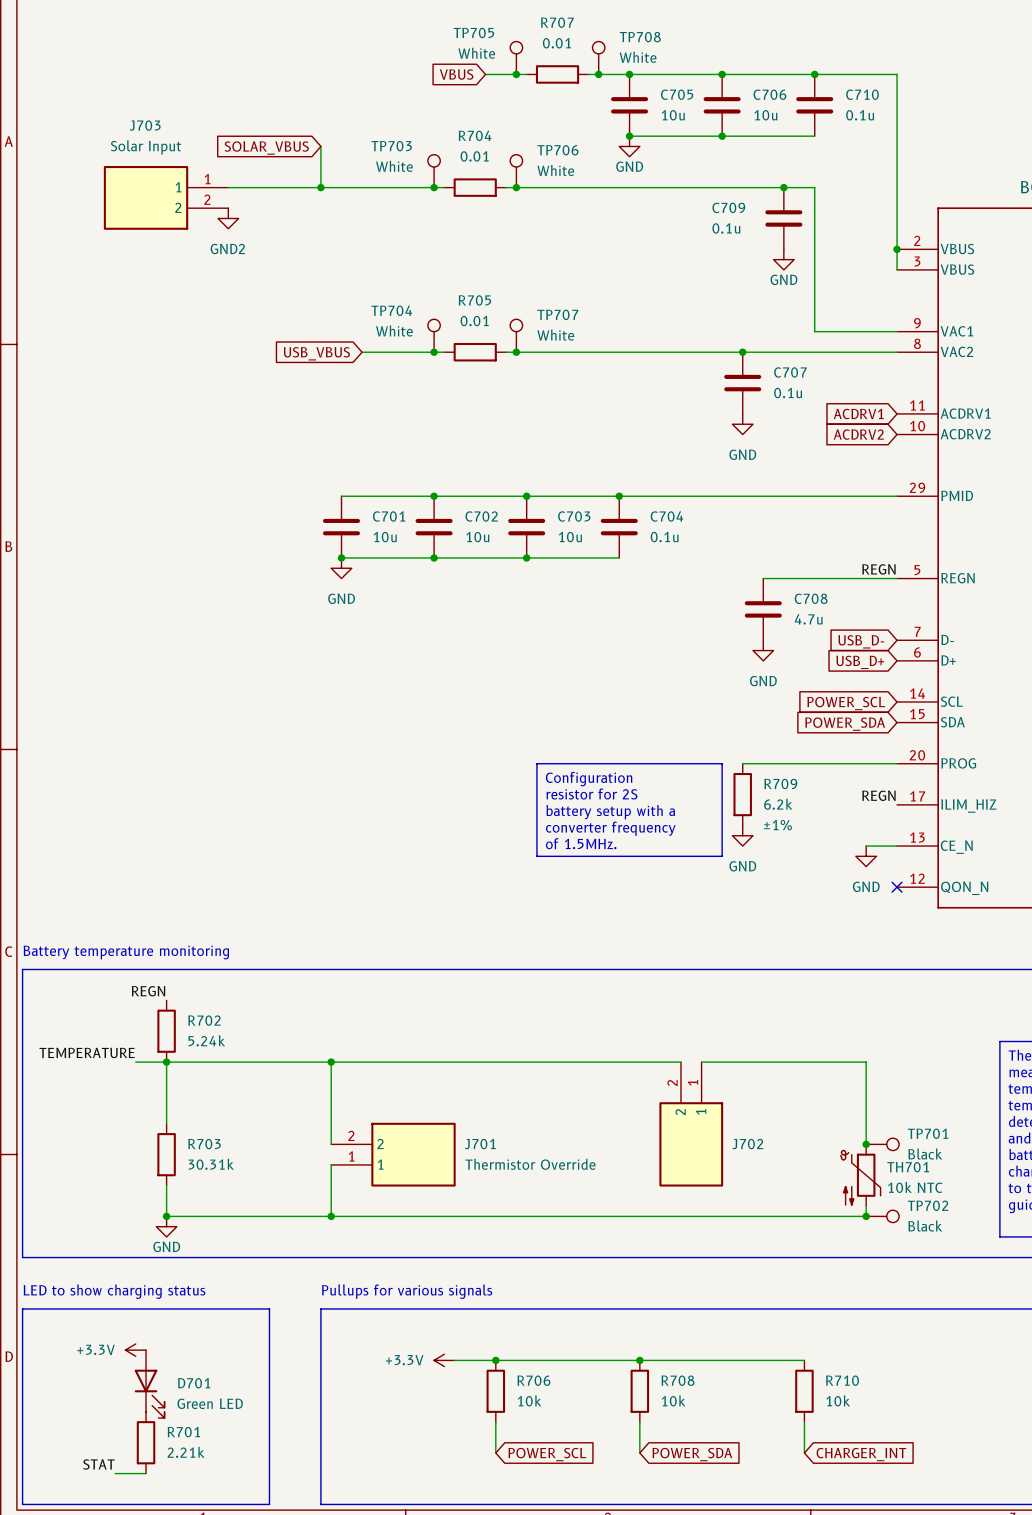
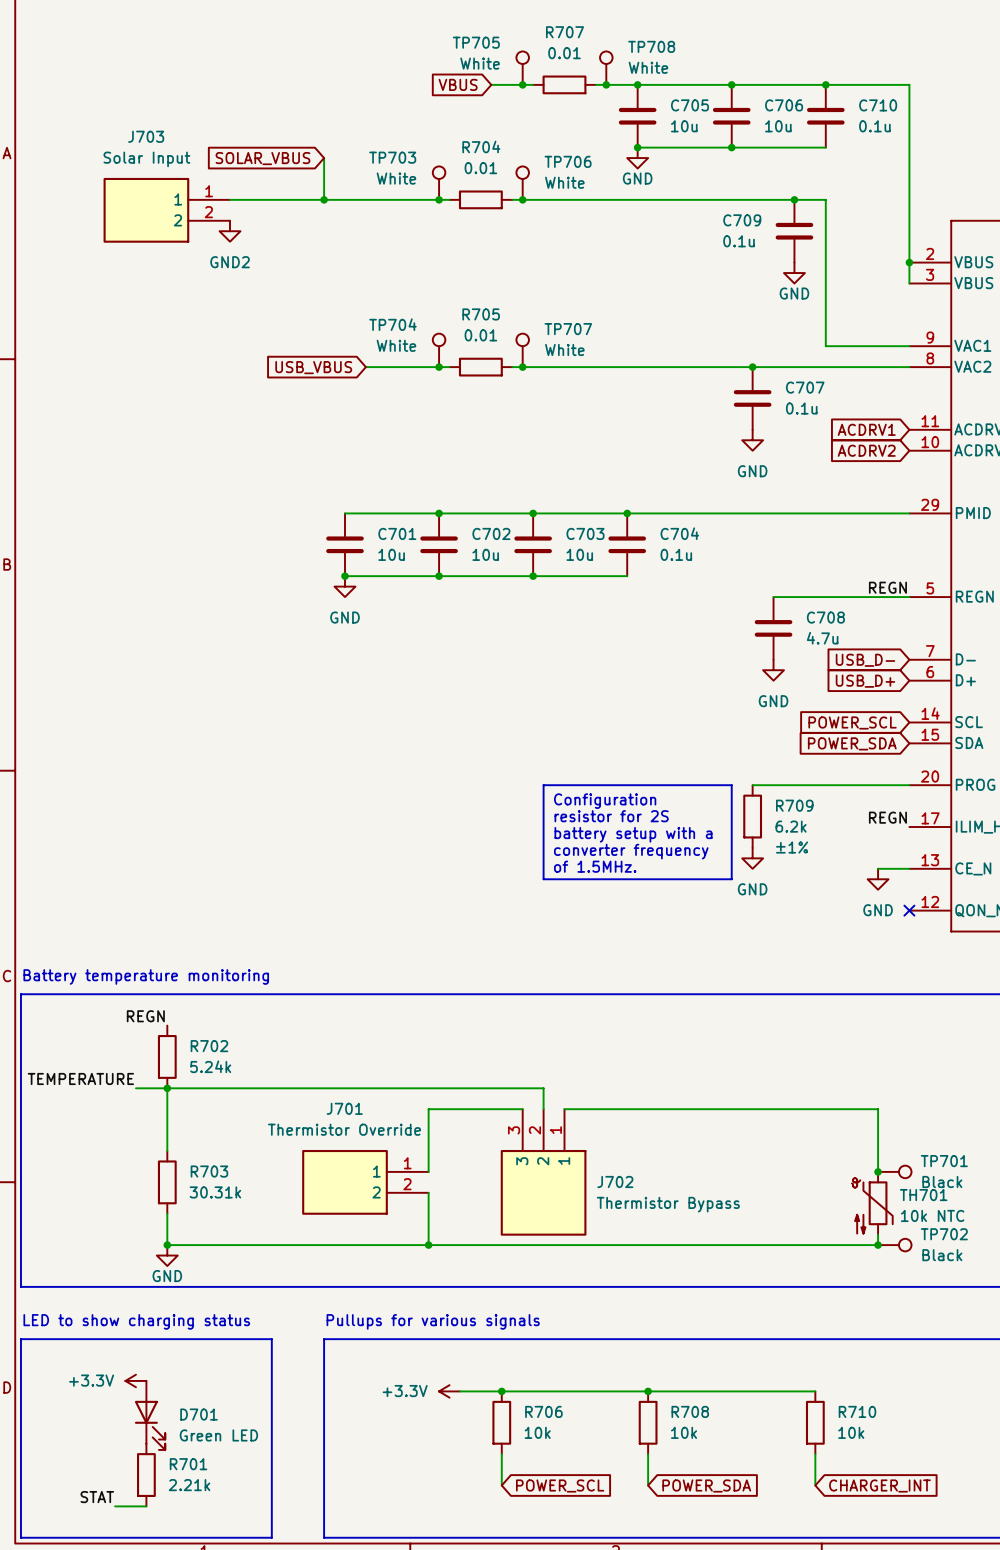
wire: (331, 1062) (331, 1144) -> none
junction: (331, 1062) -> none
wire: (536, 1062) (680, 1062) -> (543, 1088) (543, 1109)
J702 symbol: [659, 1062, 724, 1187] -> [500, 1109, 587, 1236]
wire: (701, 1062) (866, 1062) (866, 1082) -> (564, 1109) (878, 1109)
wire: none -> (522, 1109) (428, 1109) (428, 1171)
J701 name position: J701 (480, 1144) -> J701 (344, 1108)
J701 rotation: 0° (413, 1154) -> 180° (345, 1182)
wire: (331, 1164) (331, 1216) -> (428, 1192) (428, 1245)
J701 value position: Thermistor Override (530, 1164) -> Thermistor Override (344, 1129)
J702 value: none -> Thermistor Bypass (668, 1204)
junction: (331, 1216) -> none
junction: none -> (428, 1245)

